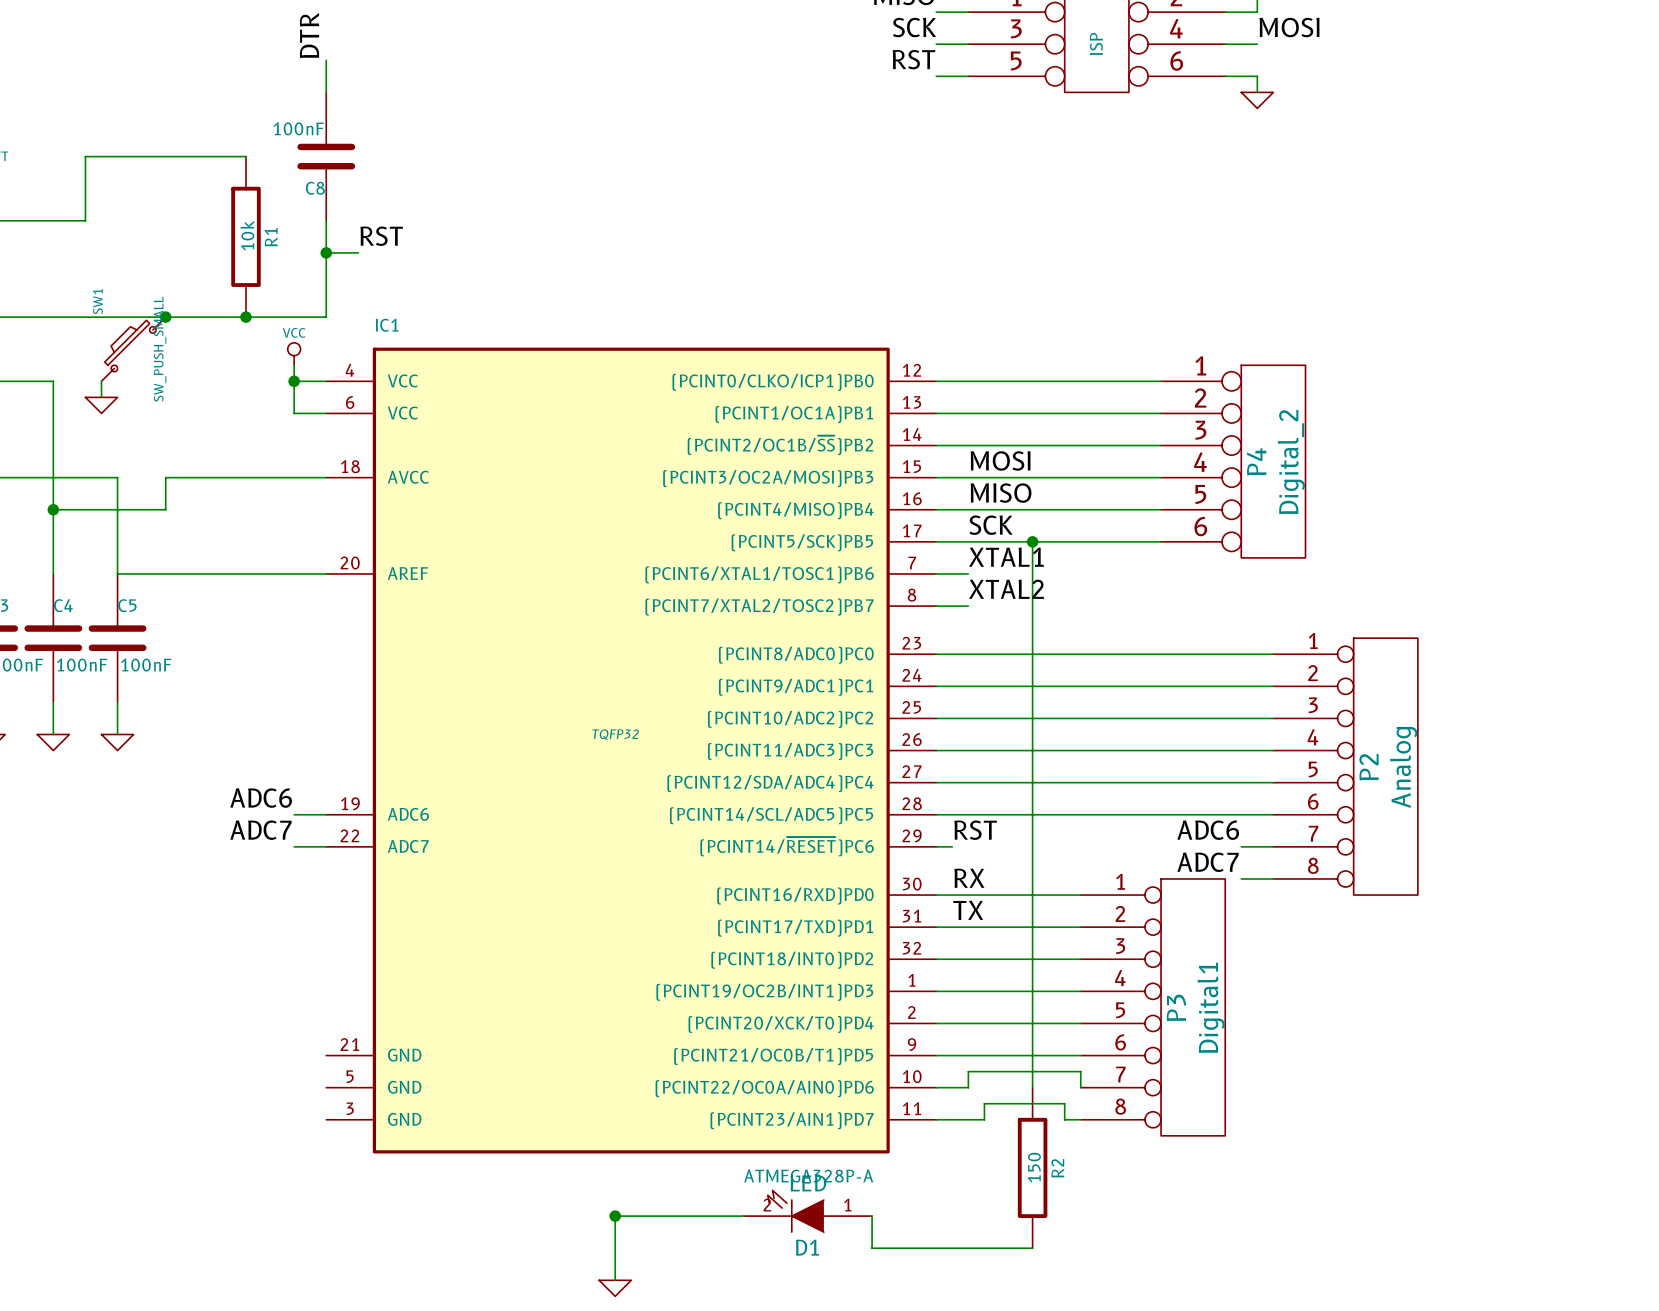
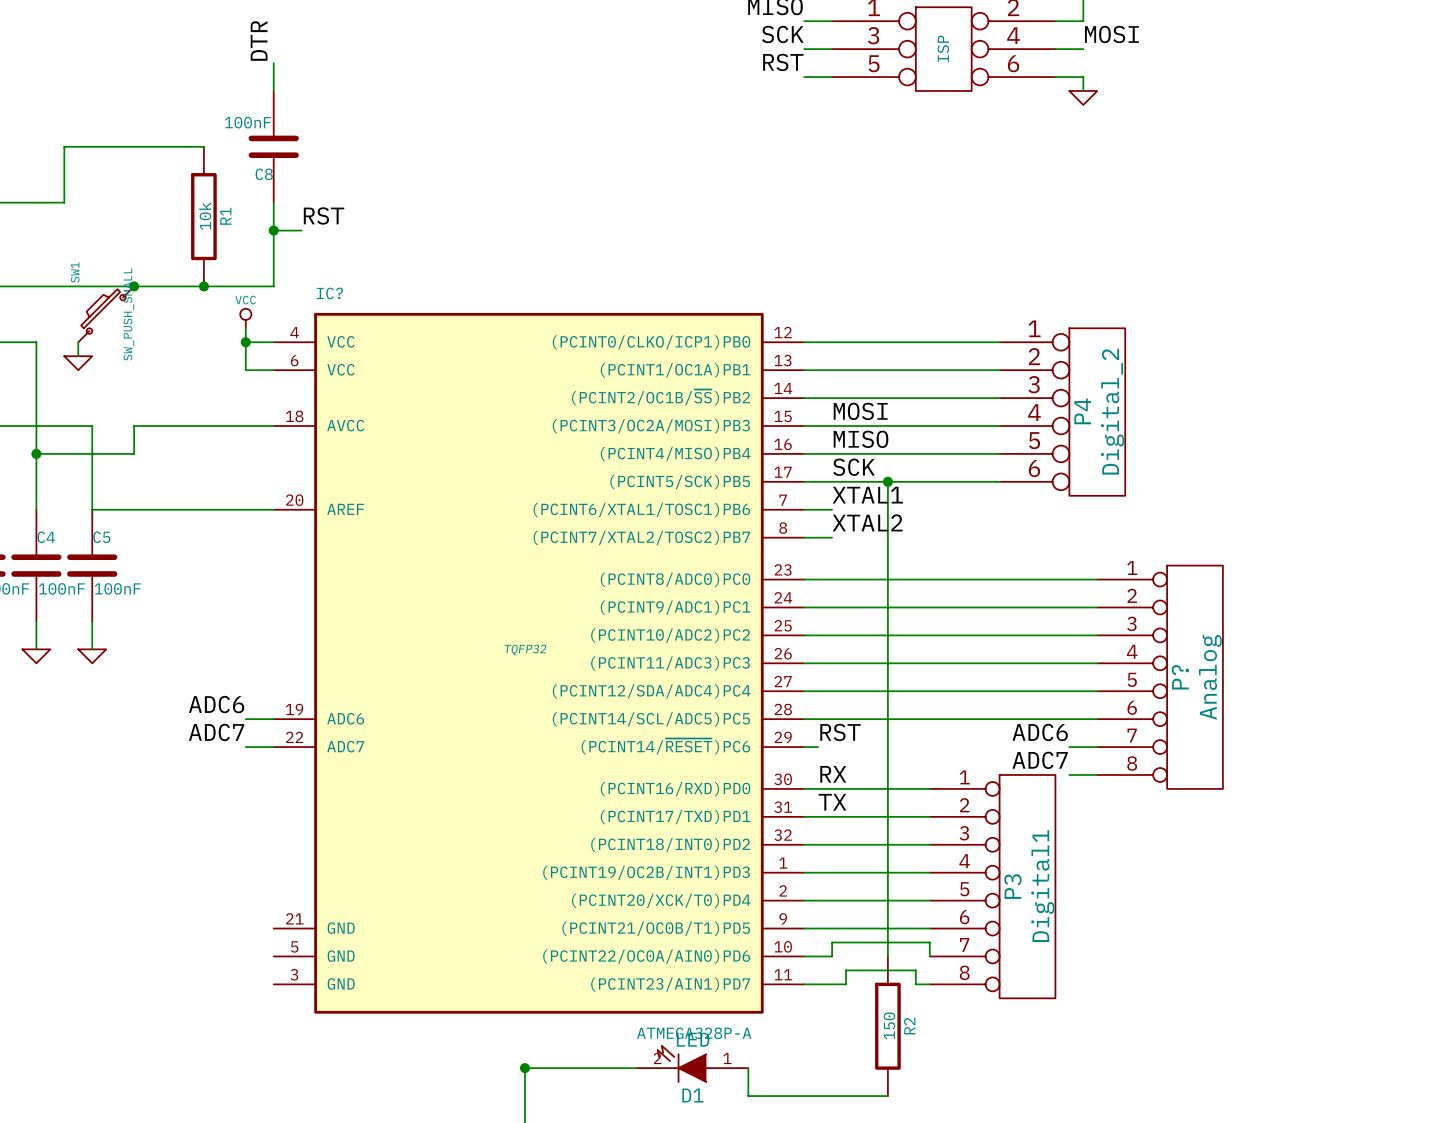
IC1 name: IC1 (387, 325) -> IC? (329, 293)
P2 name: P2 (1369, 767) -> P? (1180, 677)

